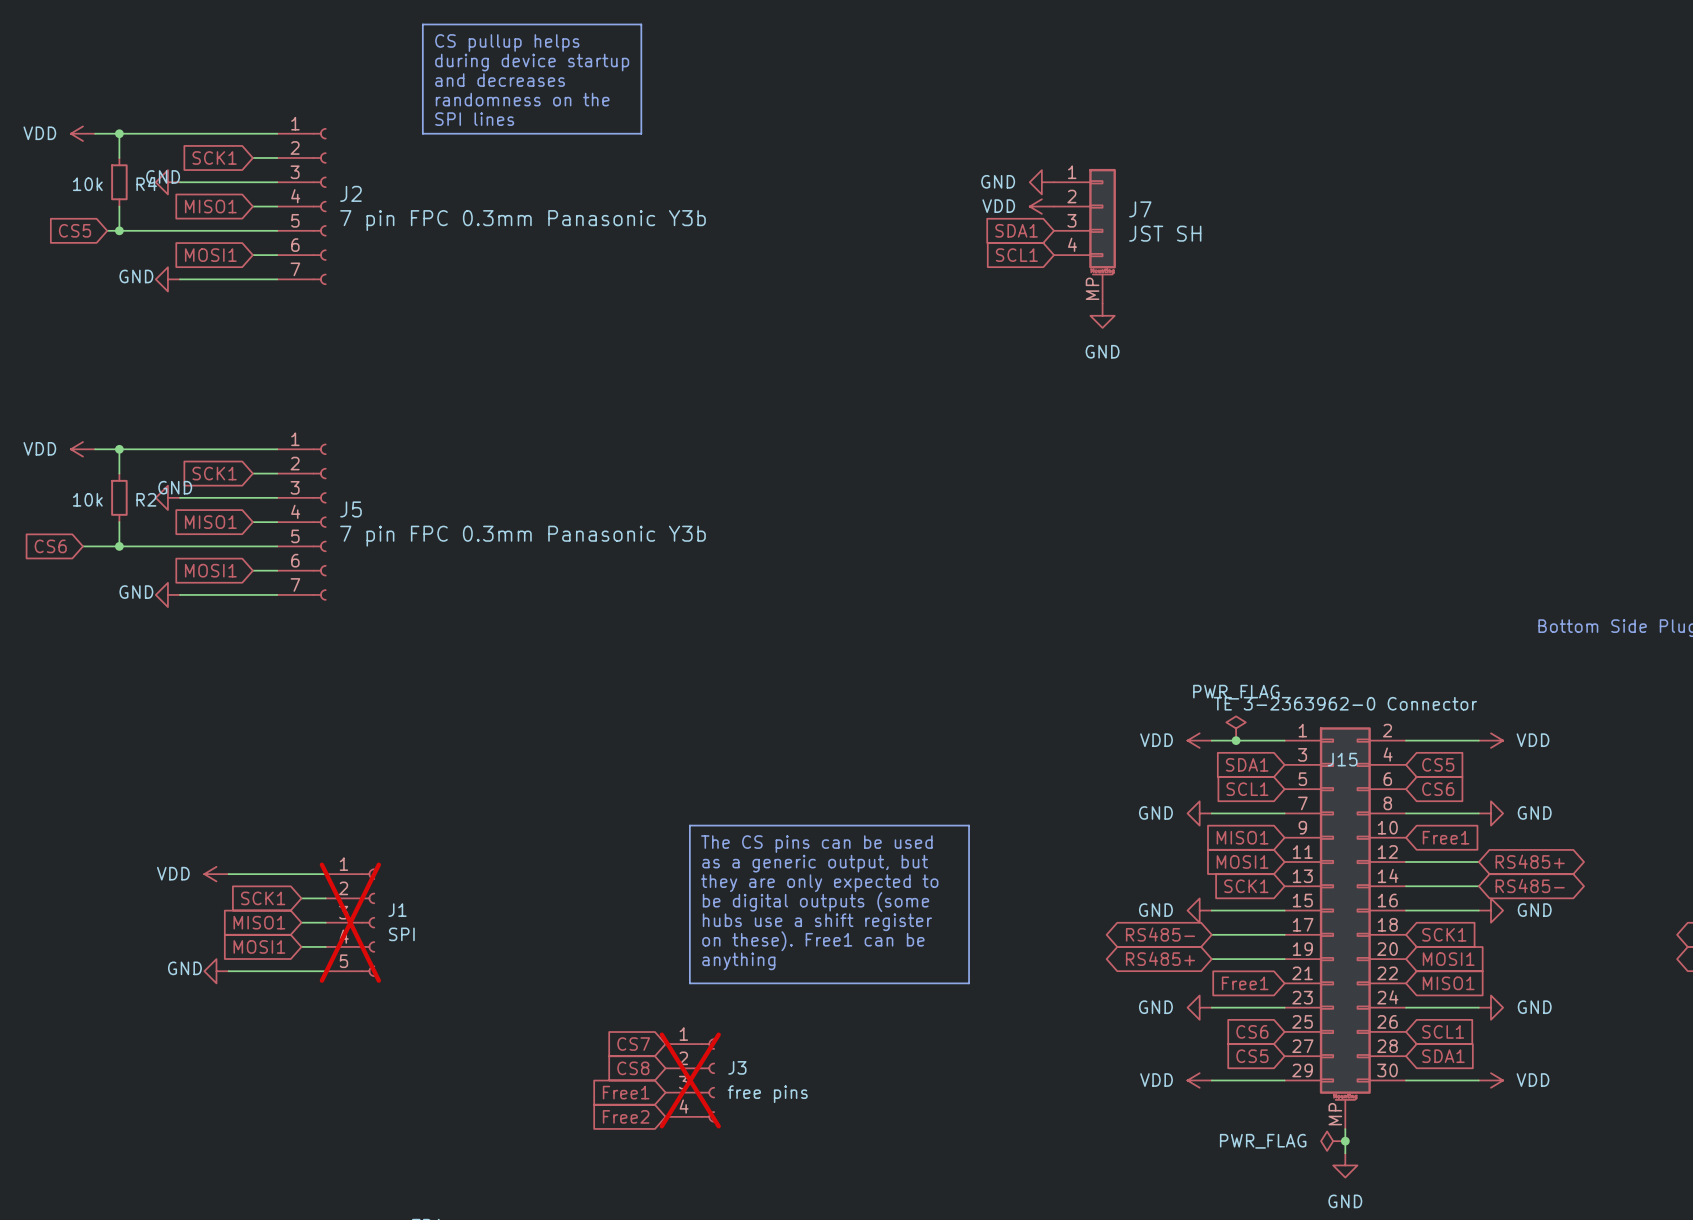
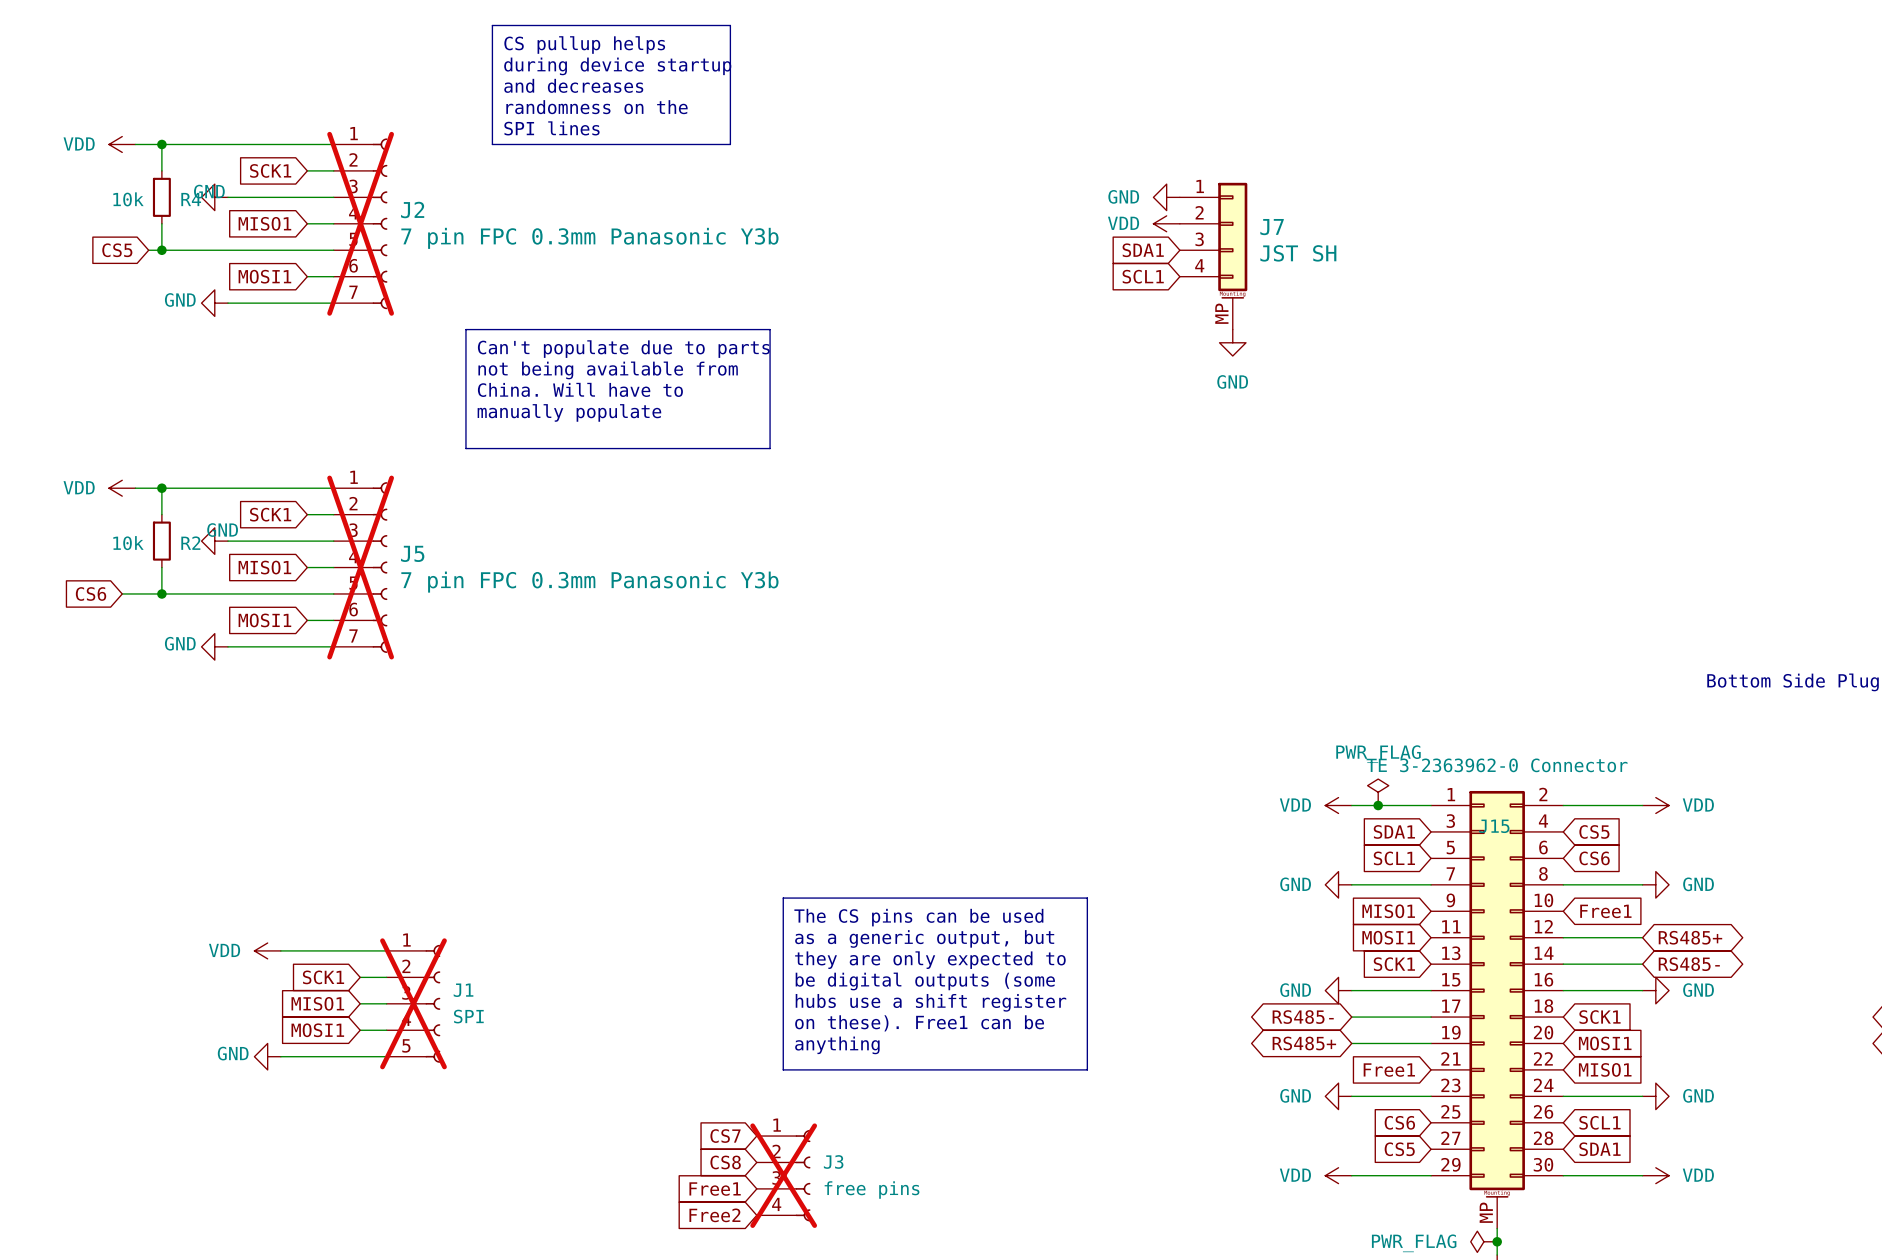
J2 do-not-place cross: none -> (360, 223)
line: none -> (465, 329) (770, 329) (770, 448) (465, 448) (465, 329)
text: none -> Can't populate due to parts (623, 349)
text: none -> not being available from (608, 370)
text: none -> China. Will have to (580, 389)
text: none -> manually populate (569, 412)
J5 do-not-place cross: none -> (360, 567)

